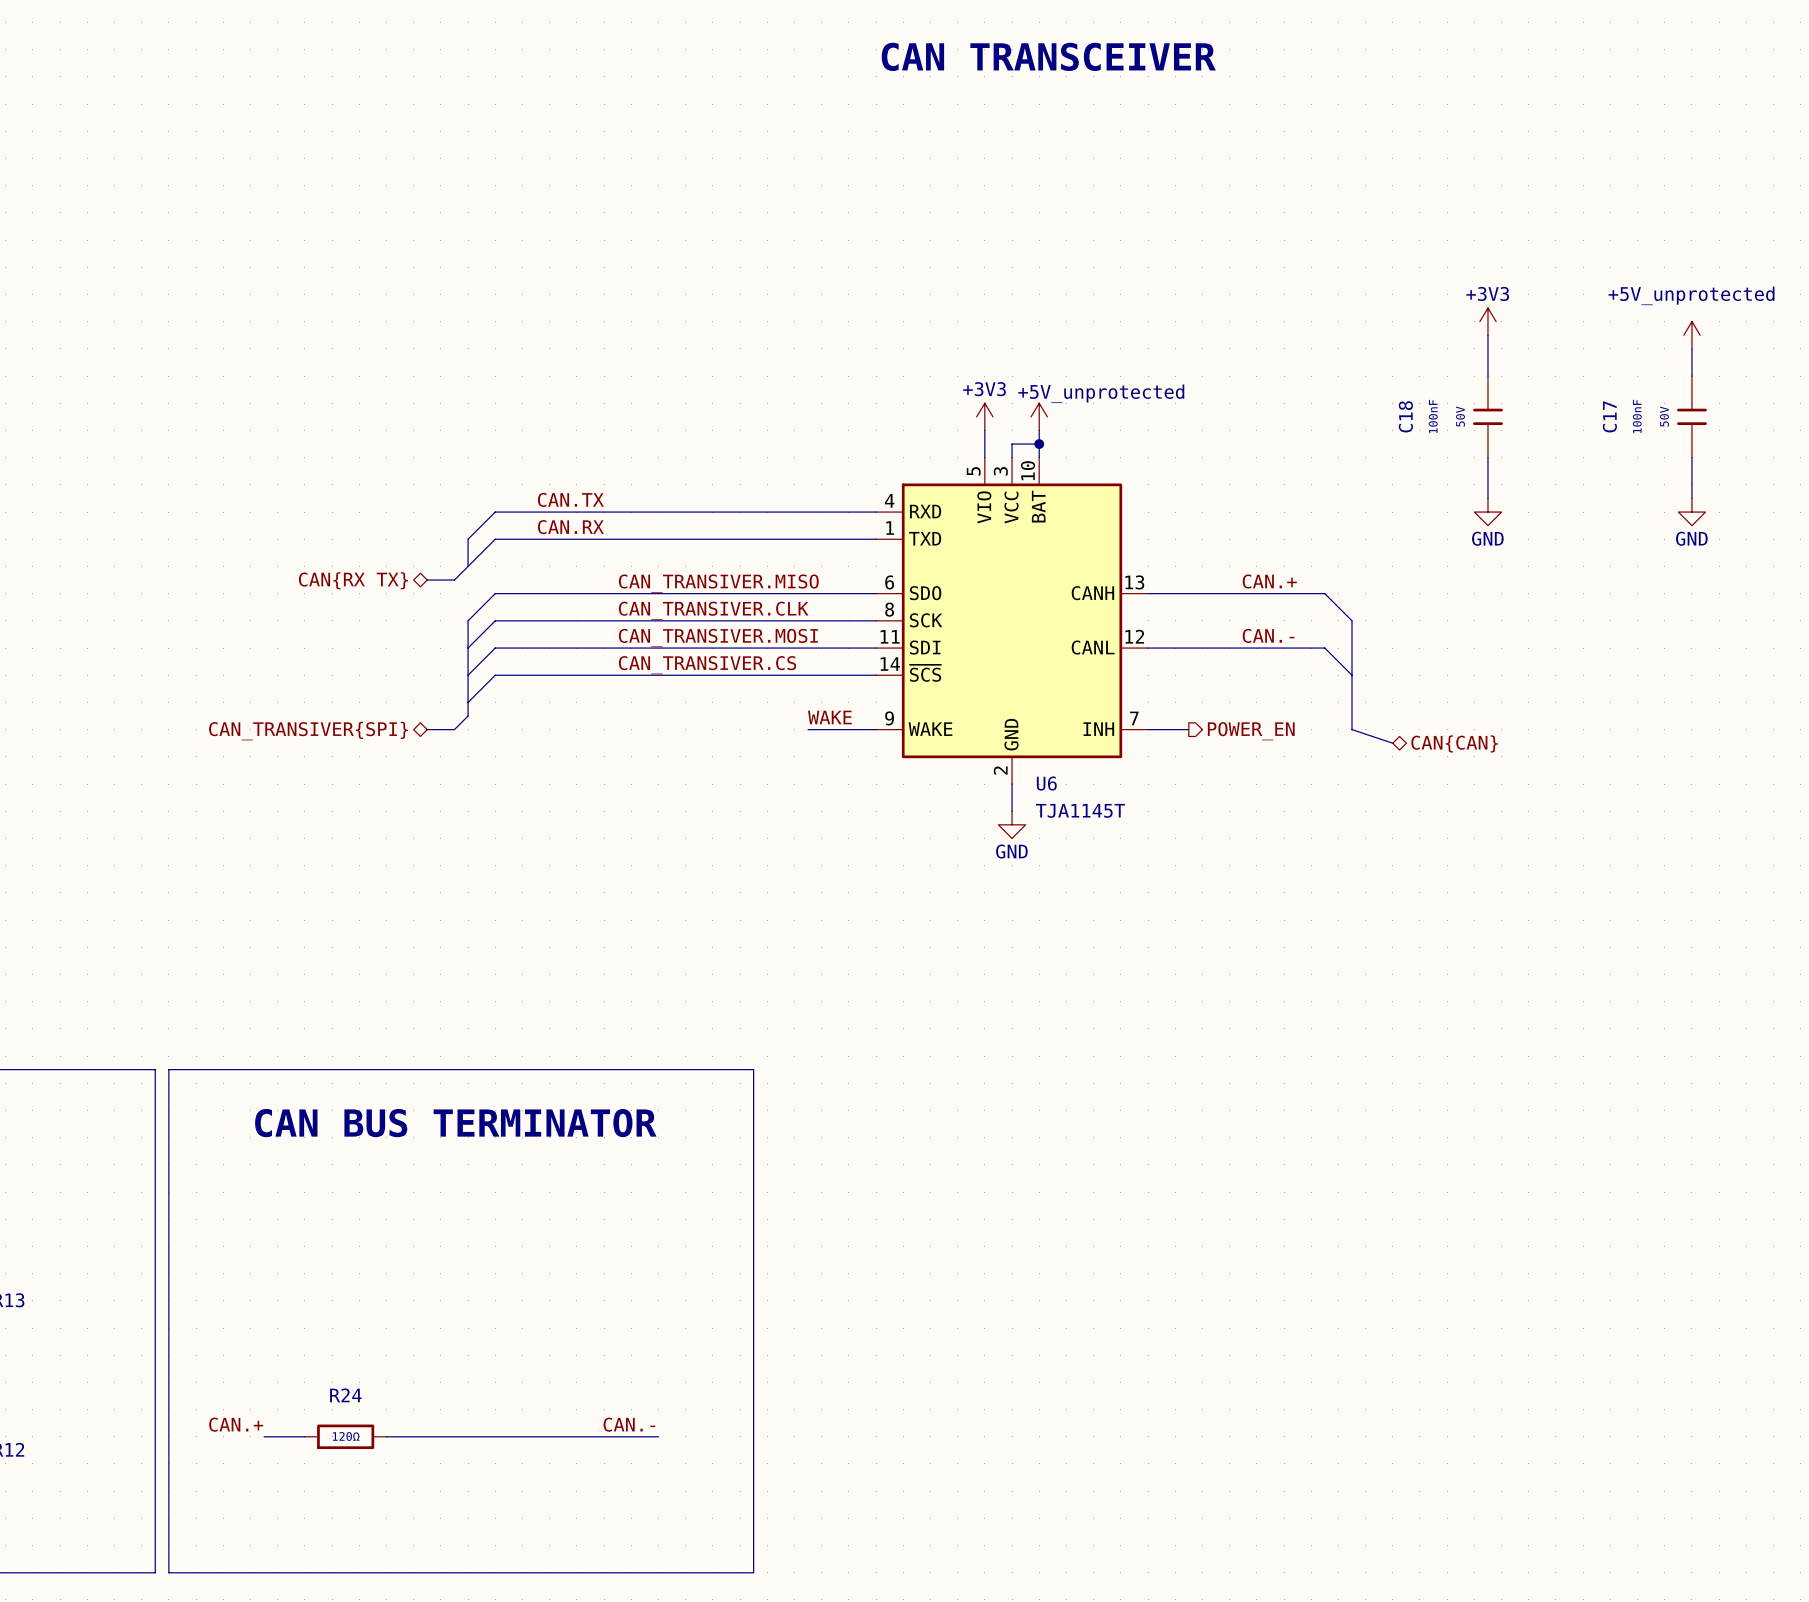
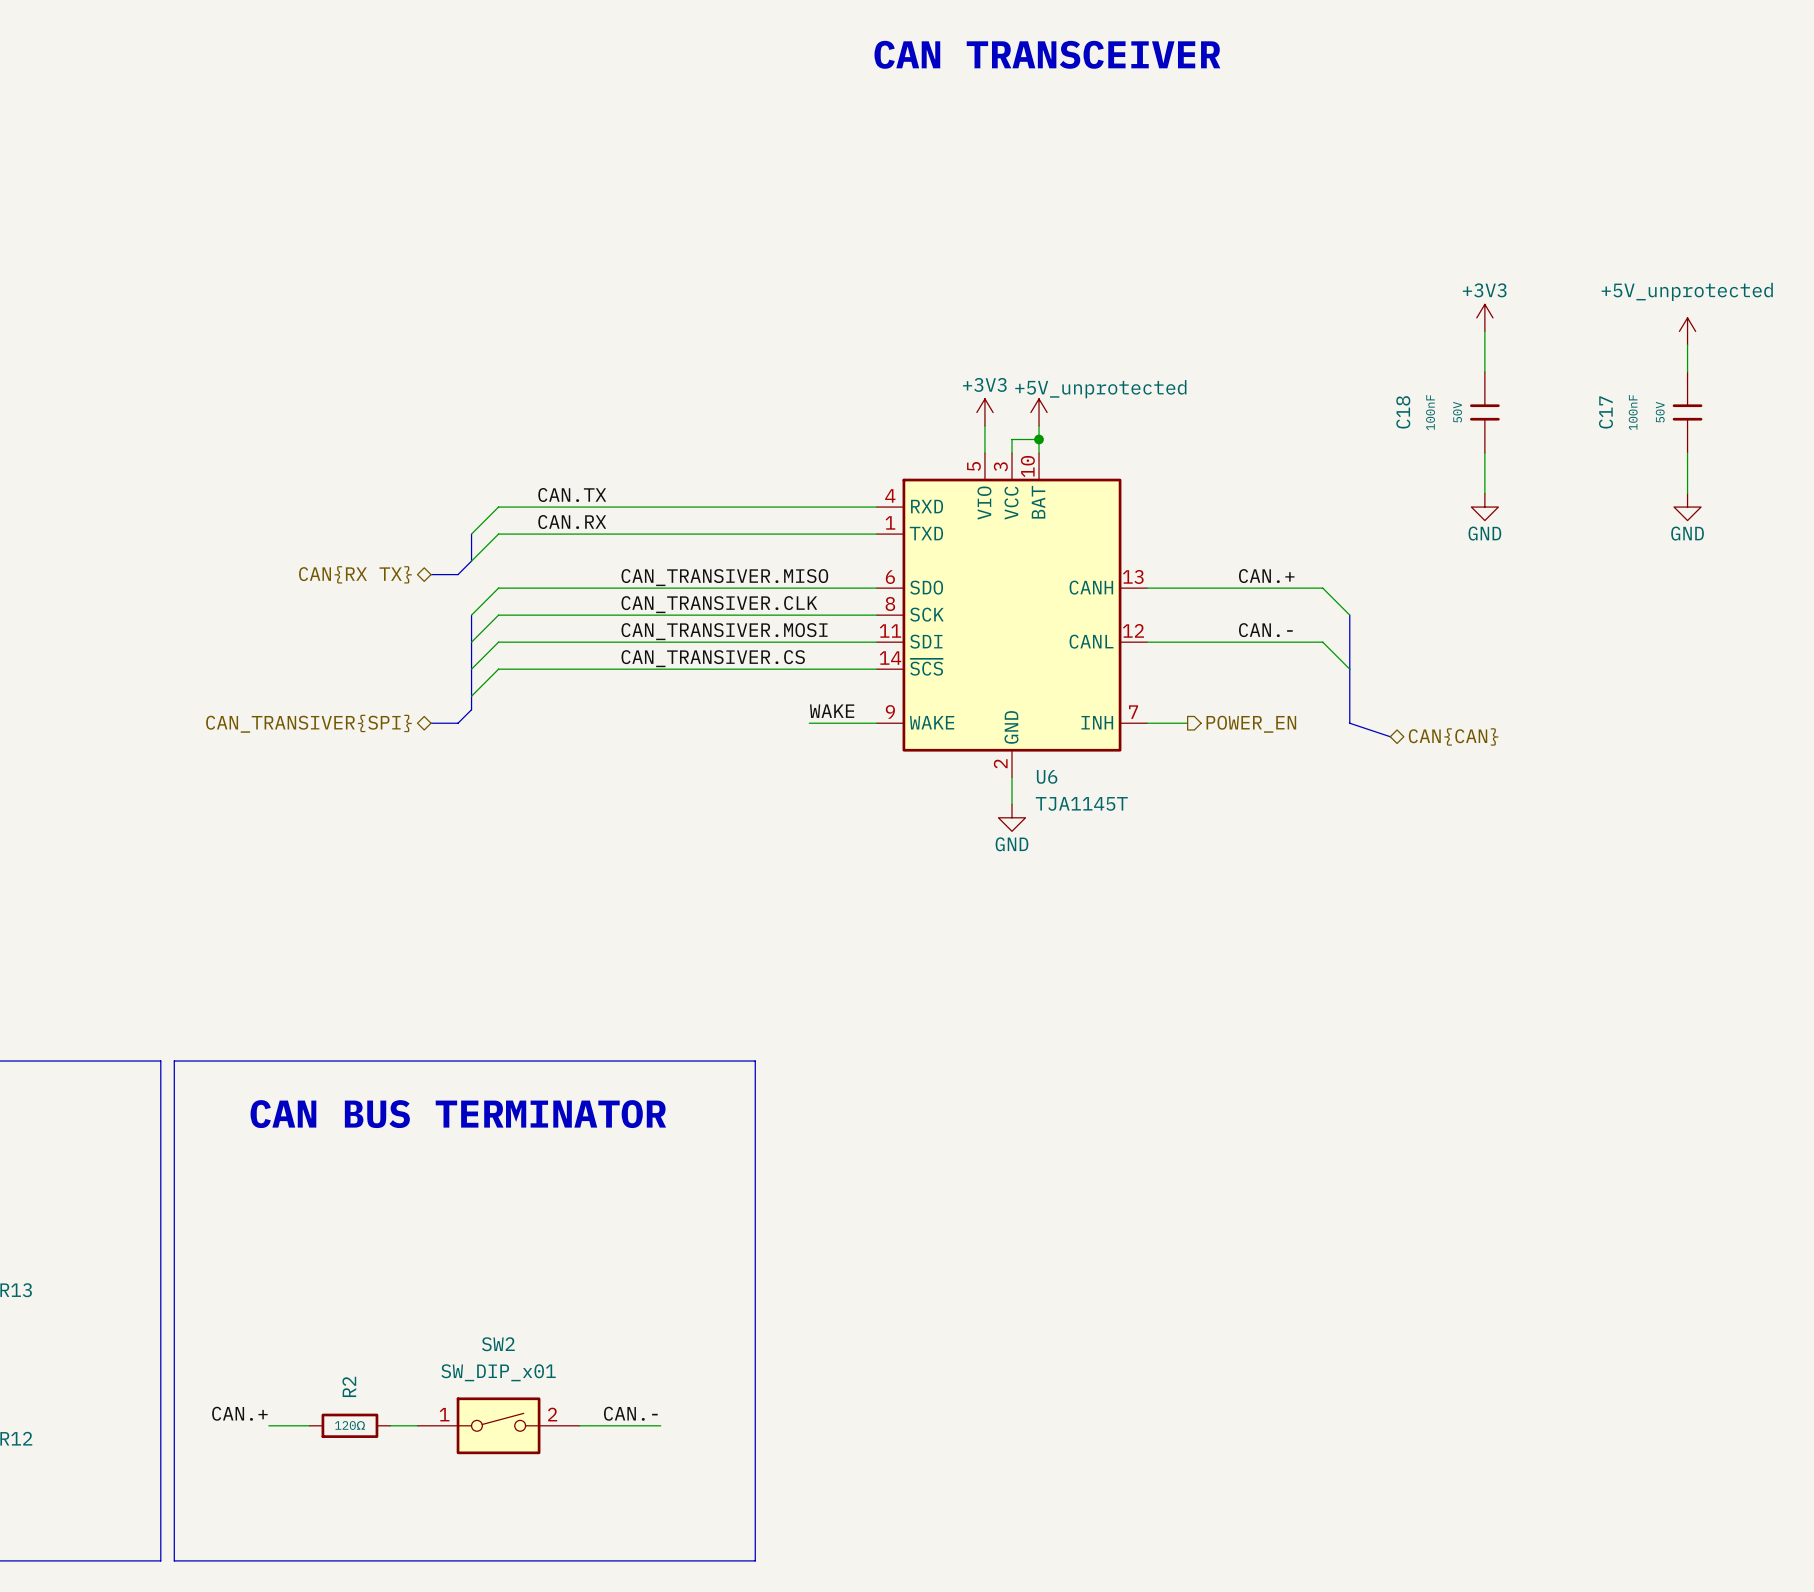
R24 name: R24 (345, 1395) -> R2 (349, 1386)
SW2: none -> SW_DIP_x01 (498, 1425)

